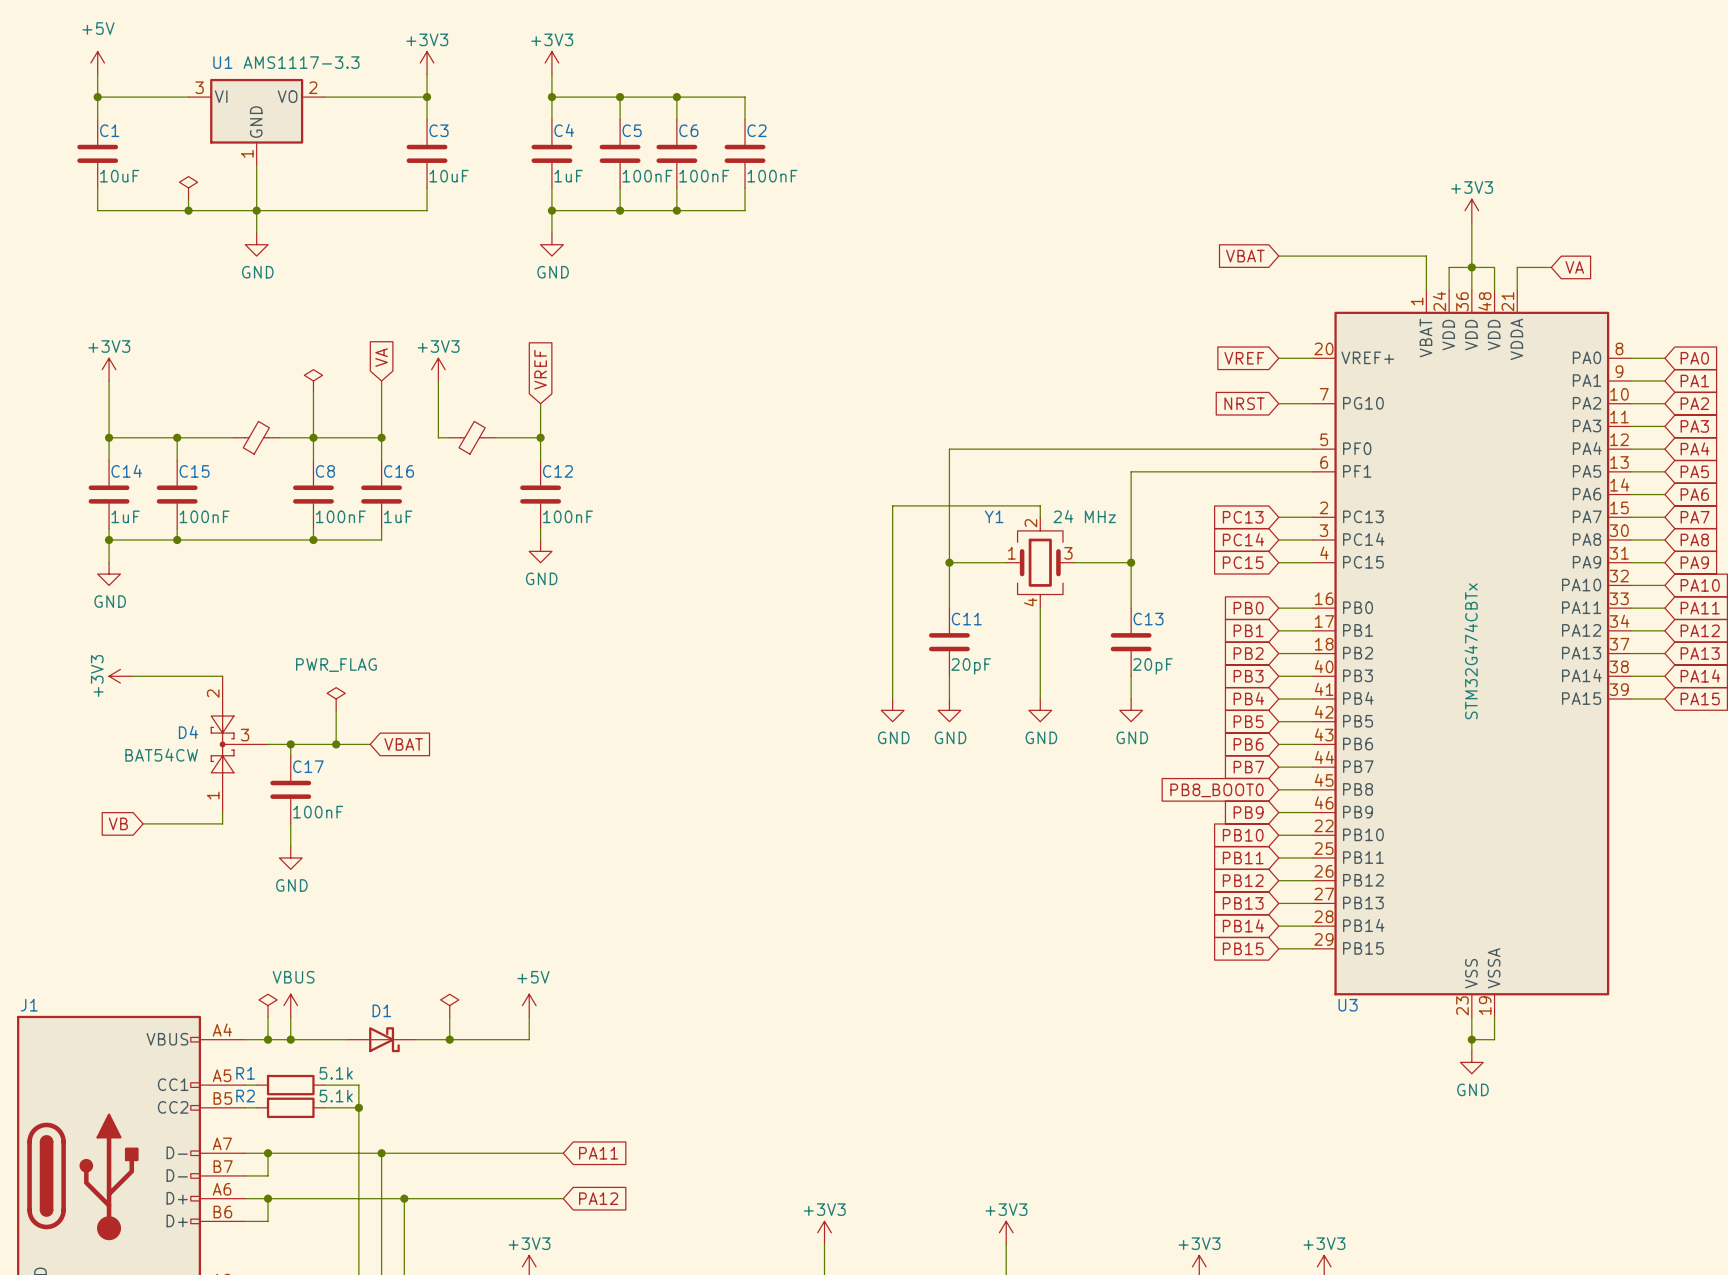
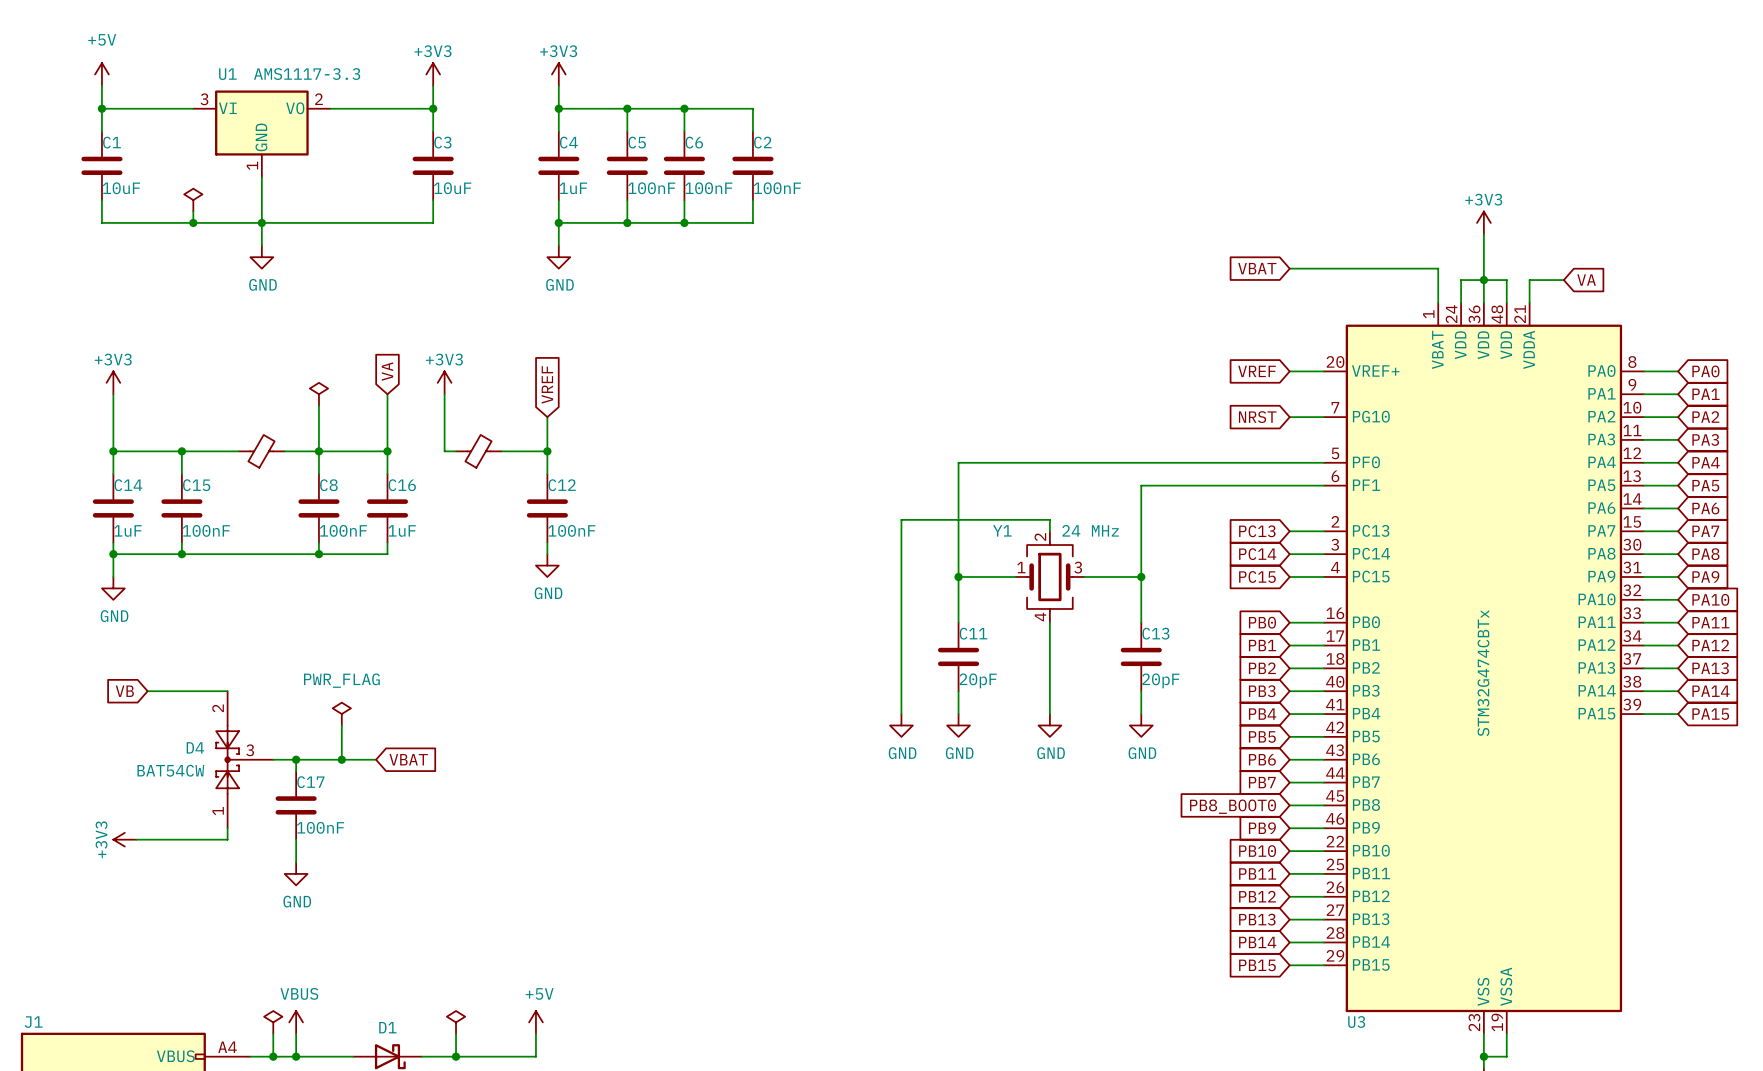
power symbol position: +3V3 (120, 676) -> +3V3 (124, 839)
wire: (131, 676) (143, 676) -> (136, 839) (147, 839)
global label position: VB (118, 823) -> VB (124, 691)

